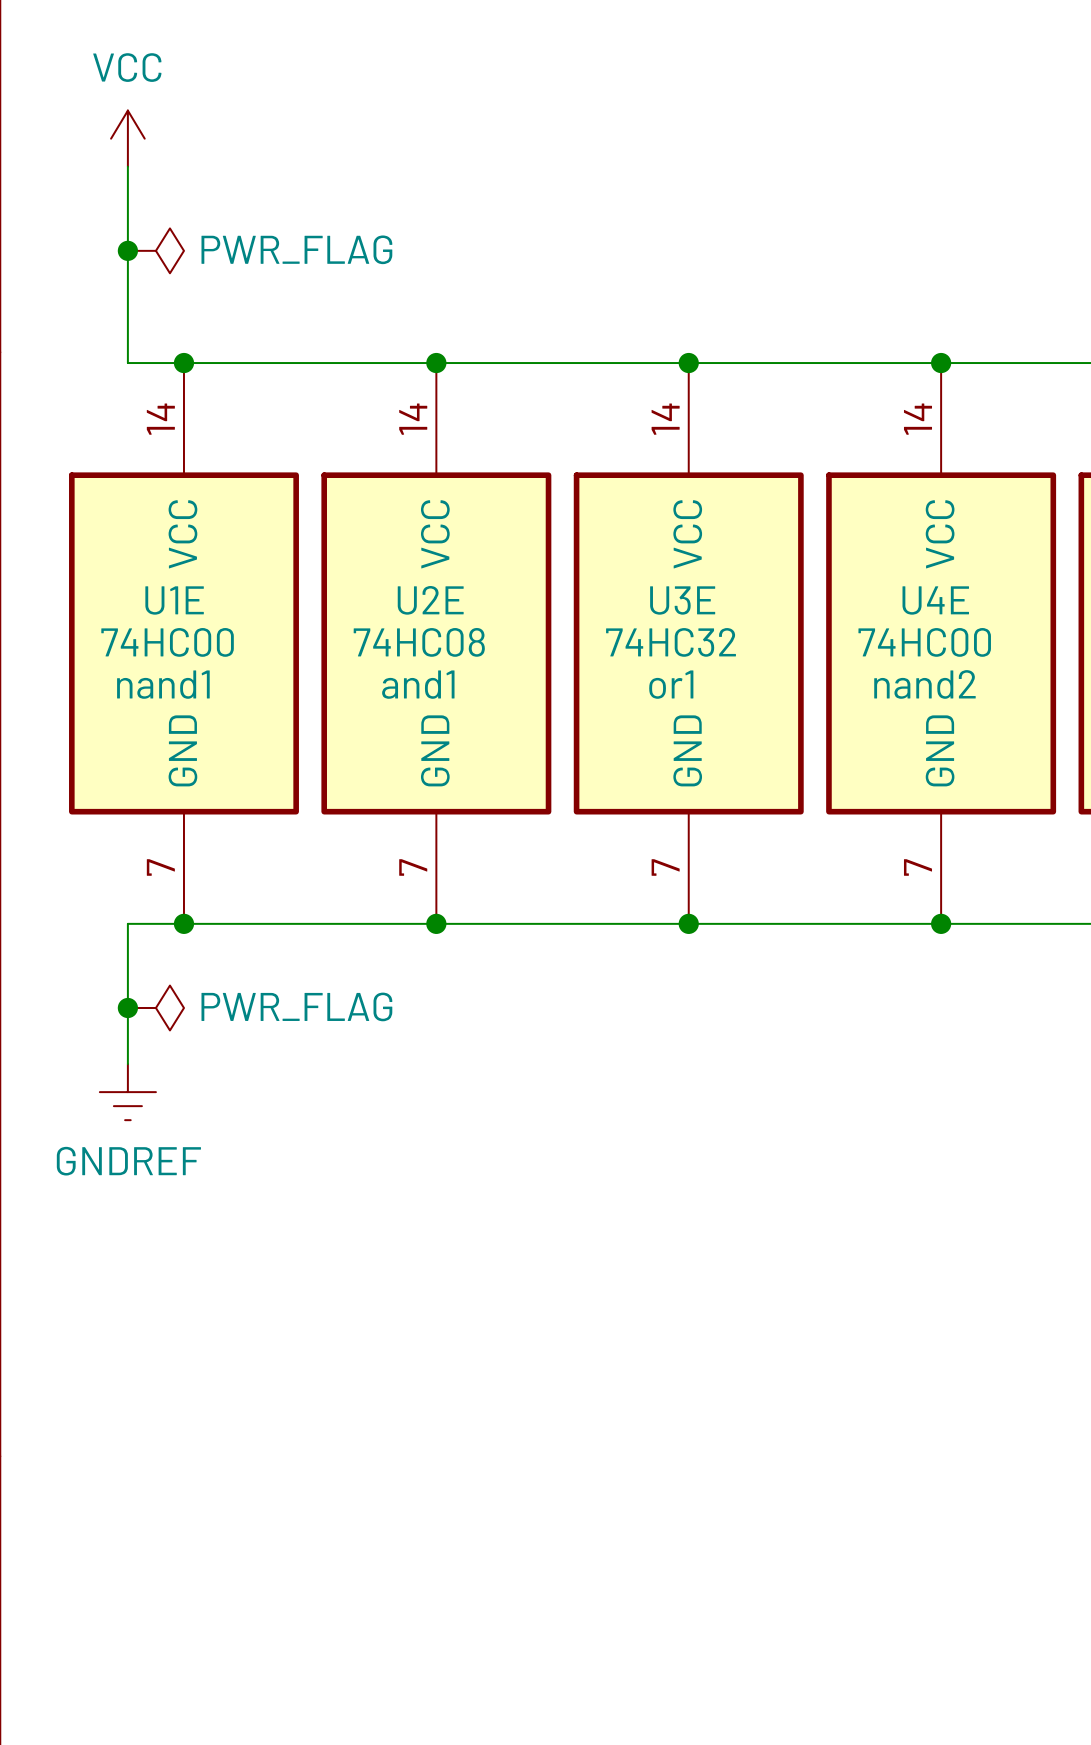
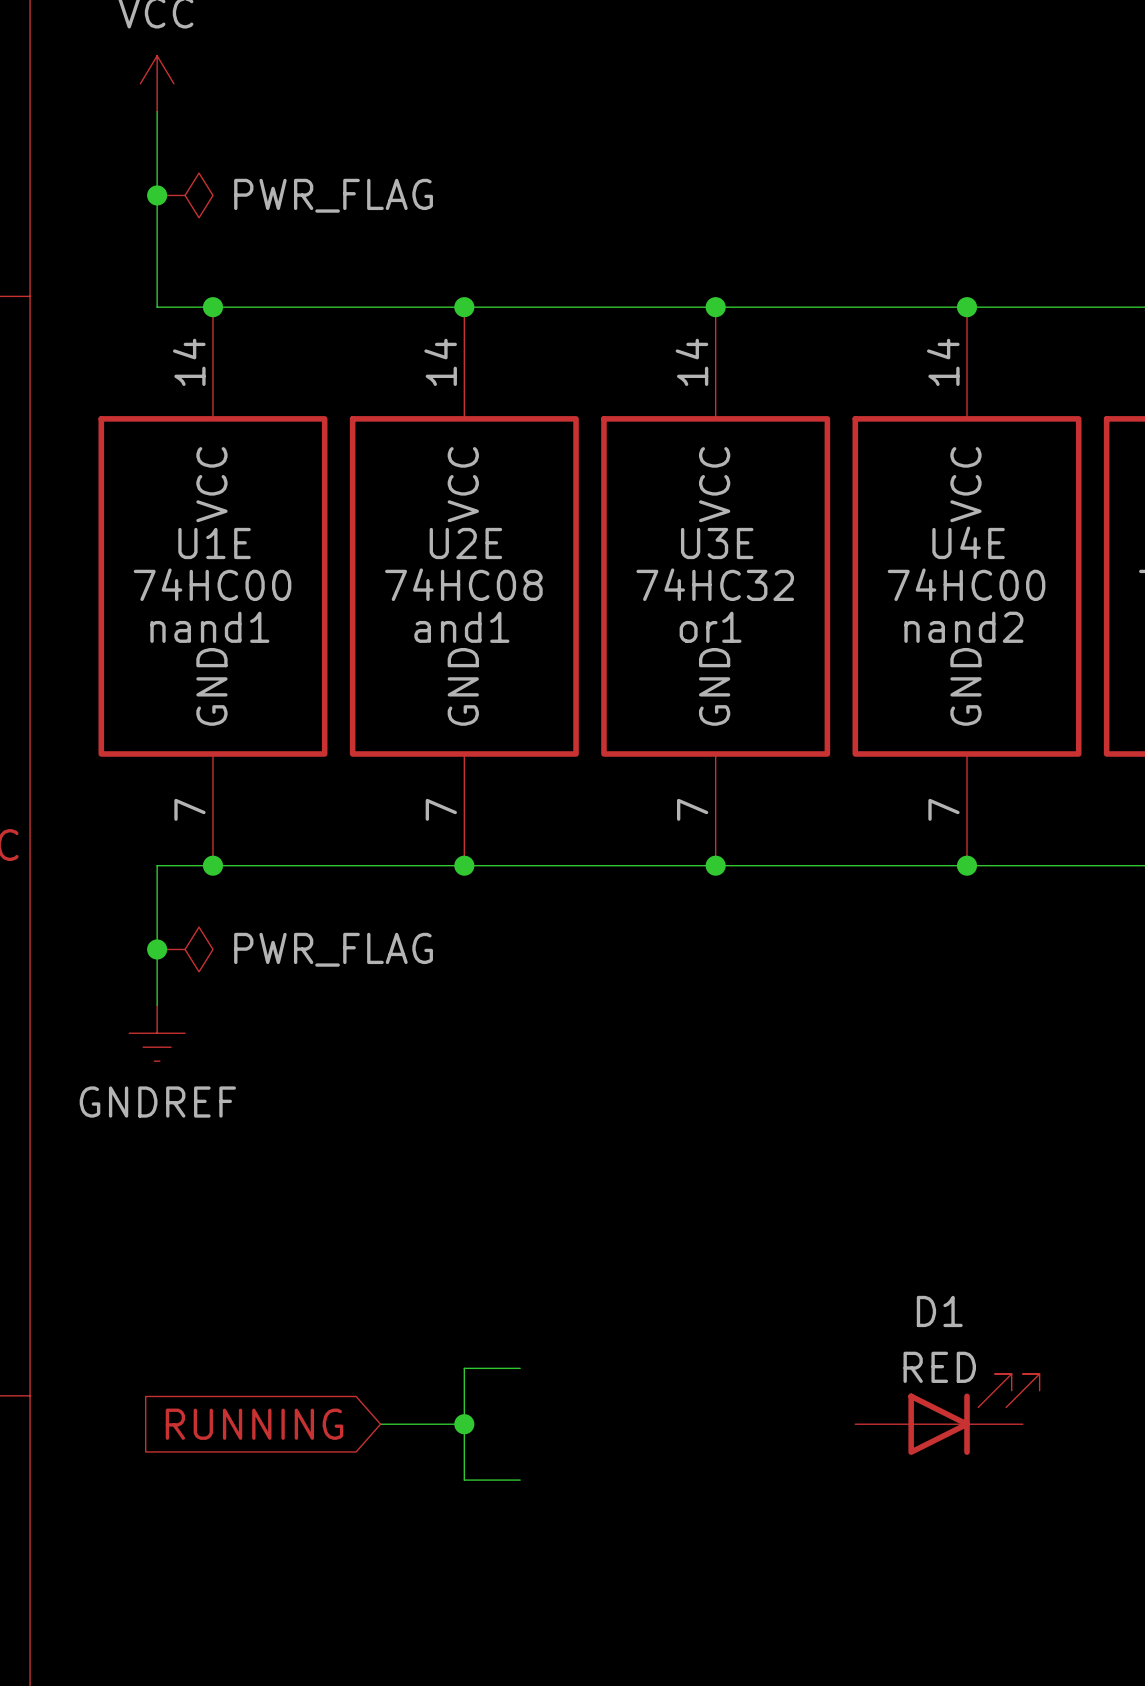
wire: none -> (520, 1368) (464, 1368) (464, 1480) (520, 1480)
D1: none -> RED (947, 1414)
global label: none -> RUNNING (254, 1424)
wire: none -> (380, 1424) (464, 1424)
junction: none -> (464, 1424)

